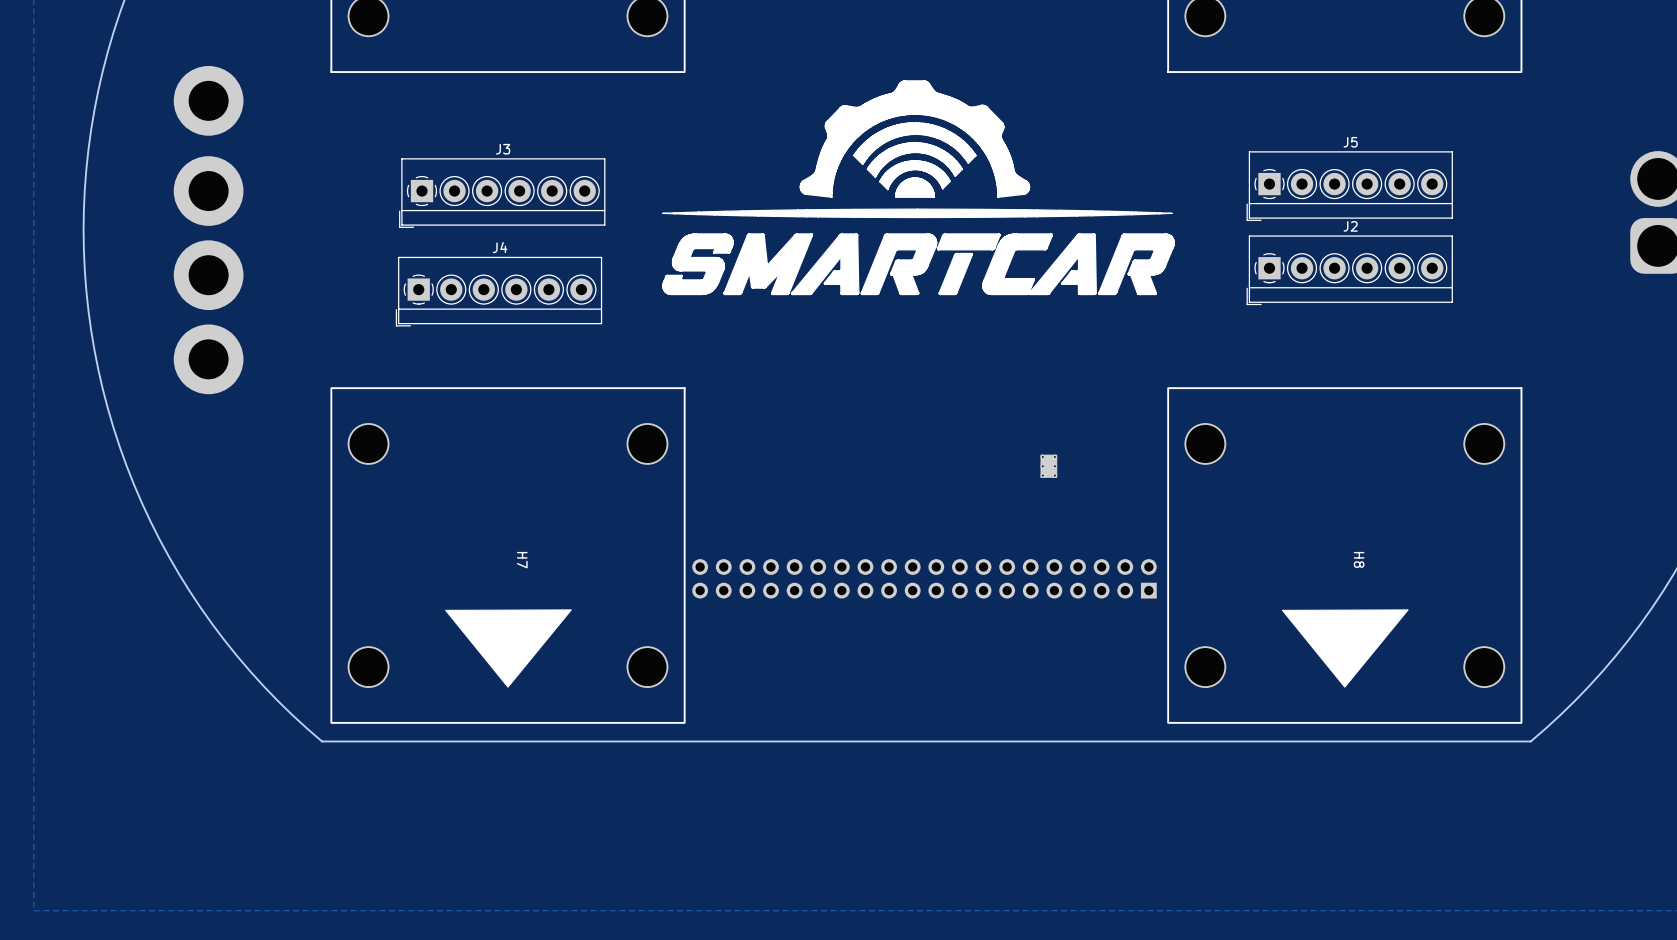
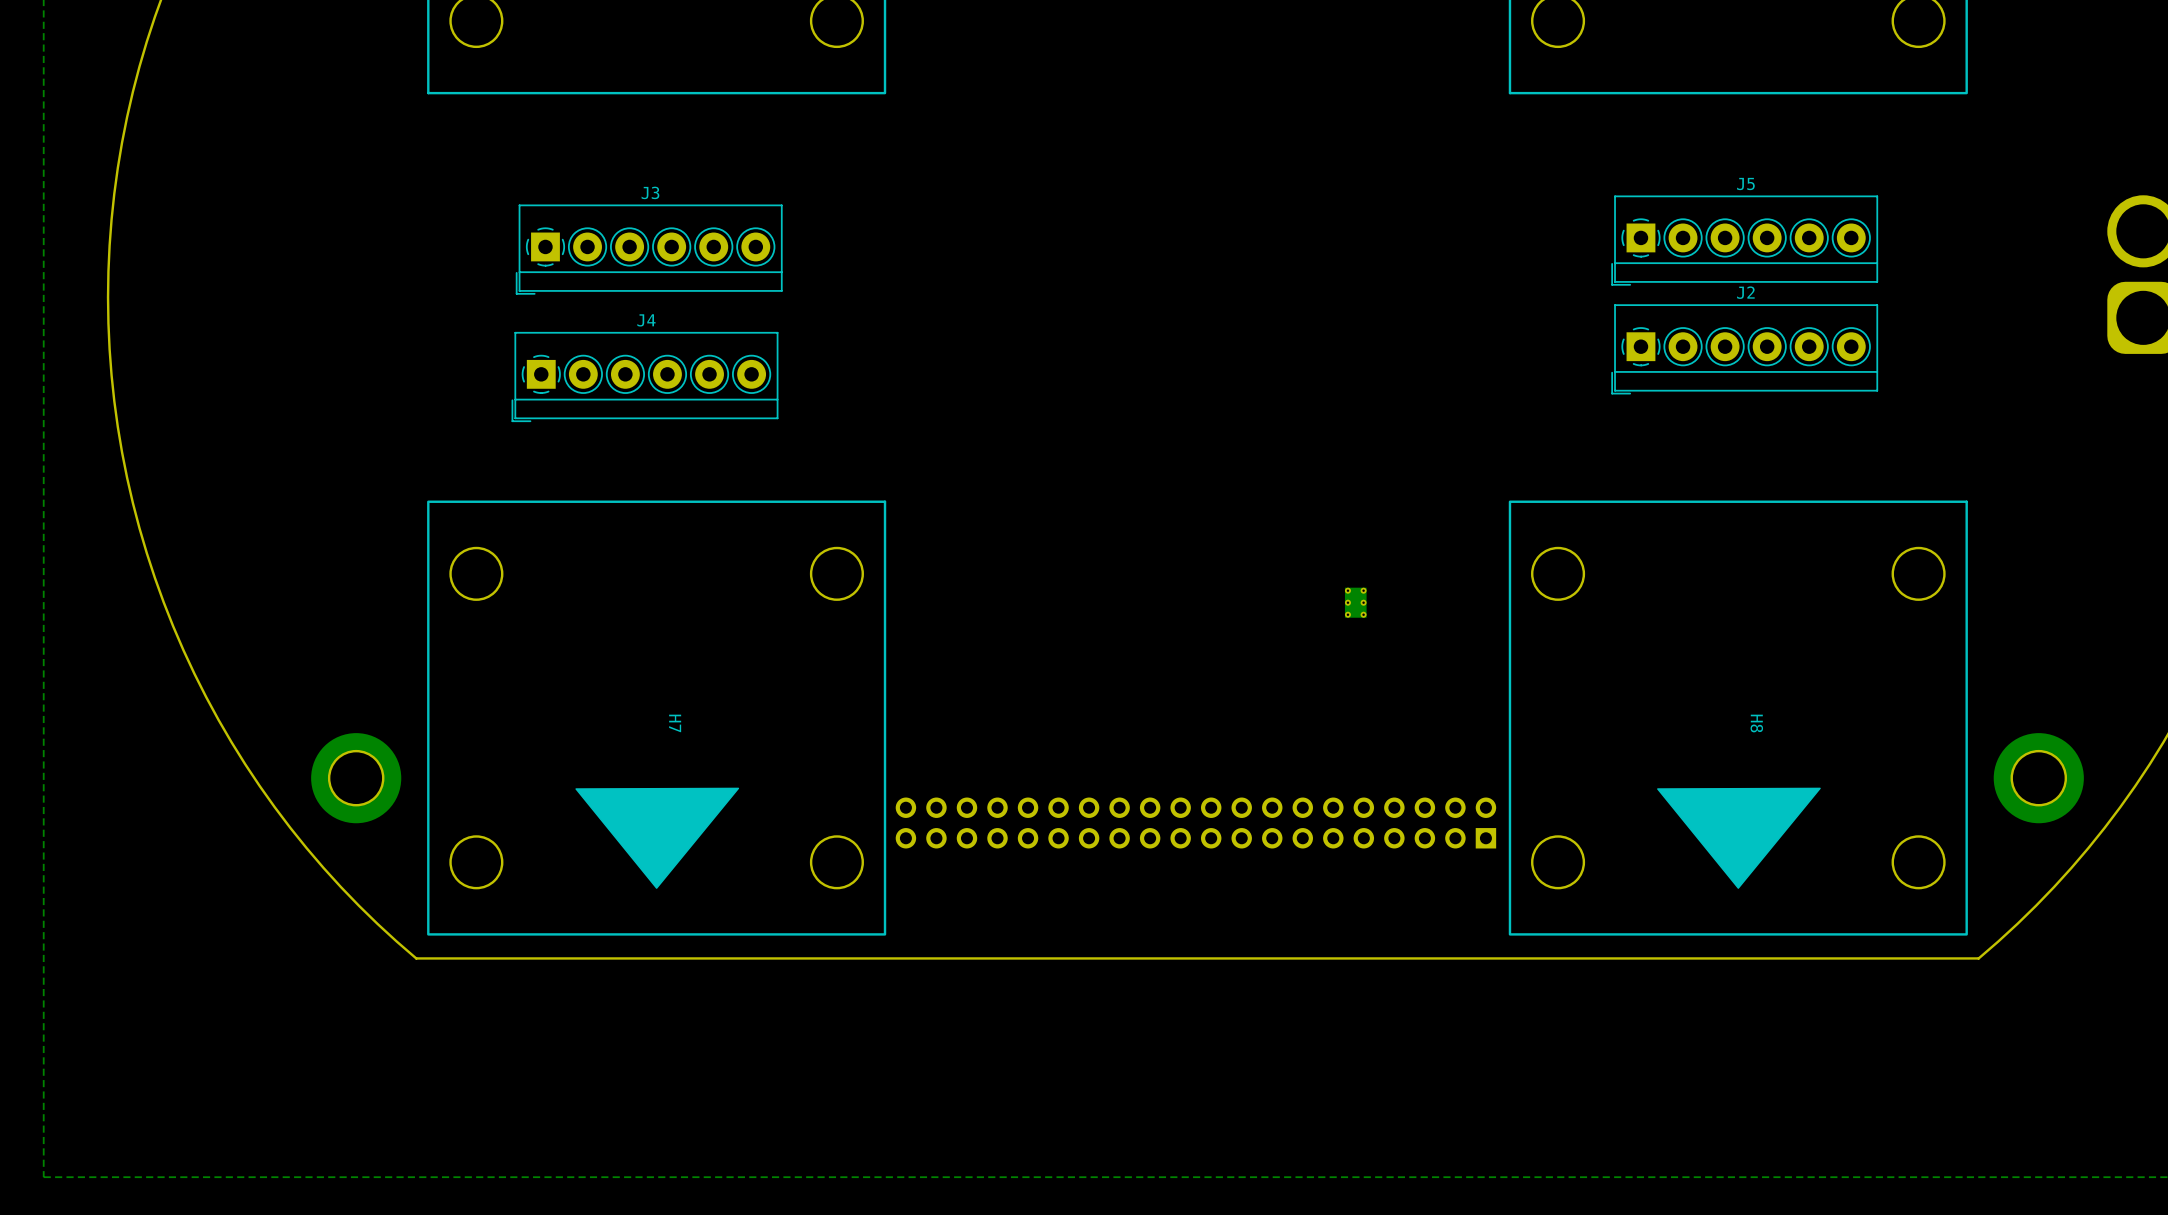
drawing: [662, 80, 1175, 296] -> none
part: (208, 100) -> none
part: (208, 191) -> none
part: (208, 275) -> none
part: (208, 359) -> none
part position: (924, 578) -> (1195, 823)
part: none -> (356, 778)
part: none -> (2038, 778)

